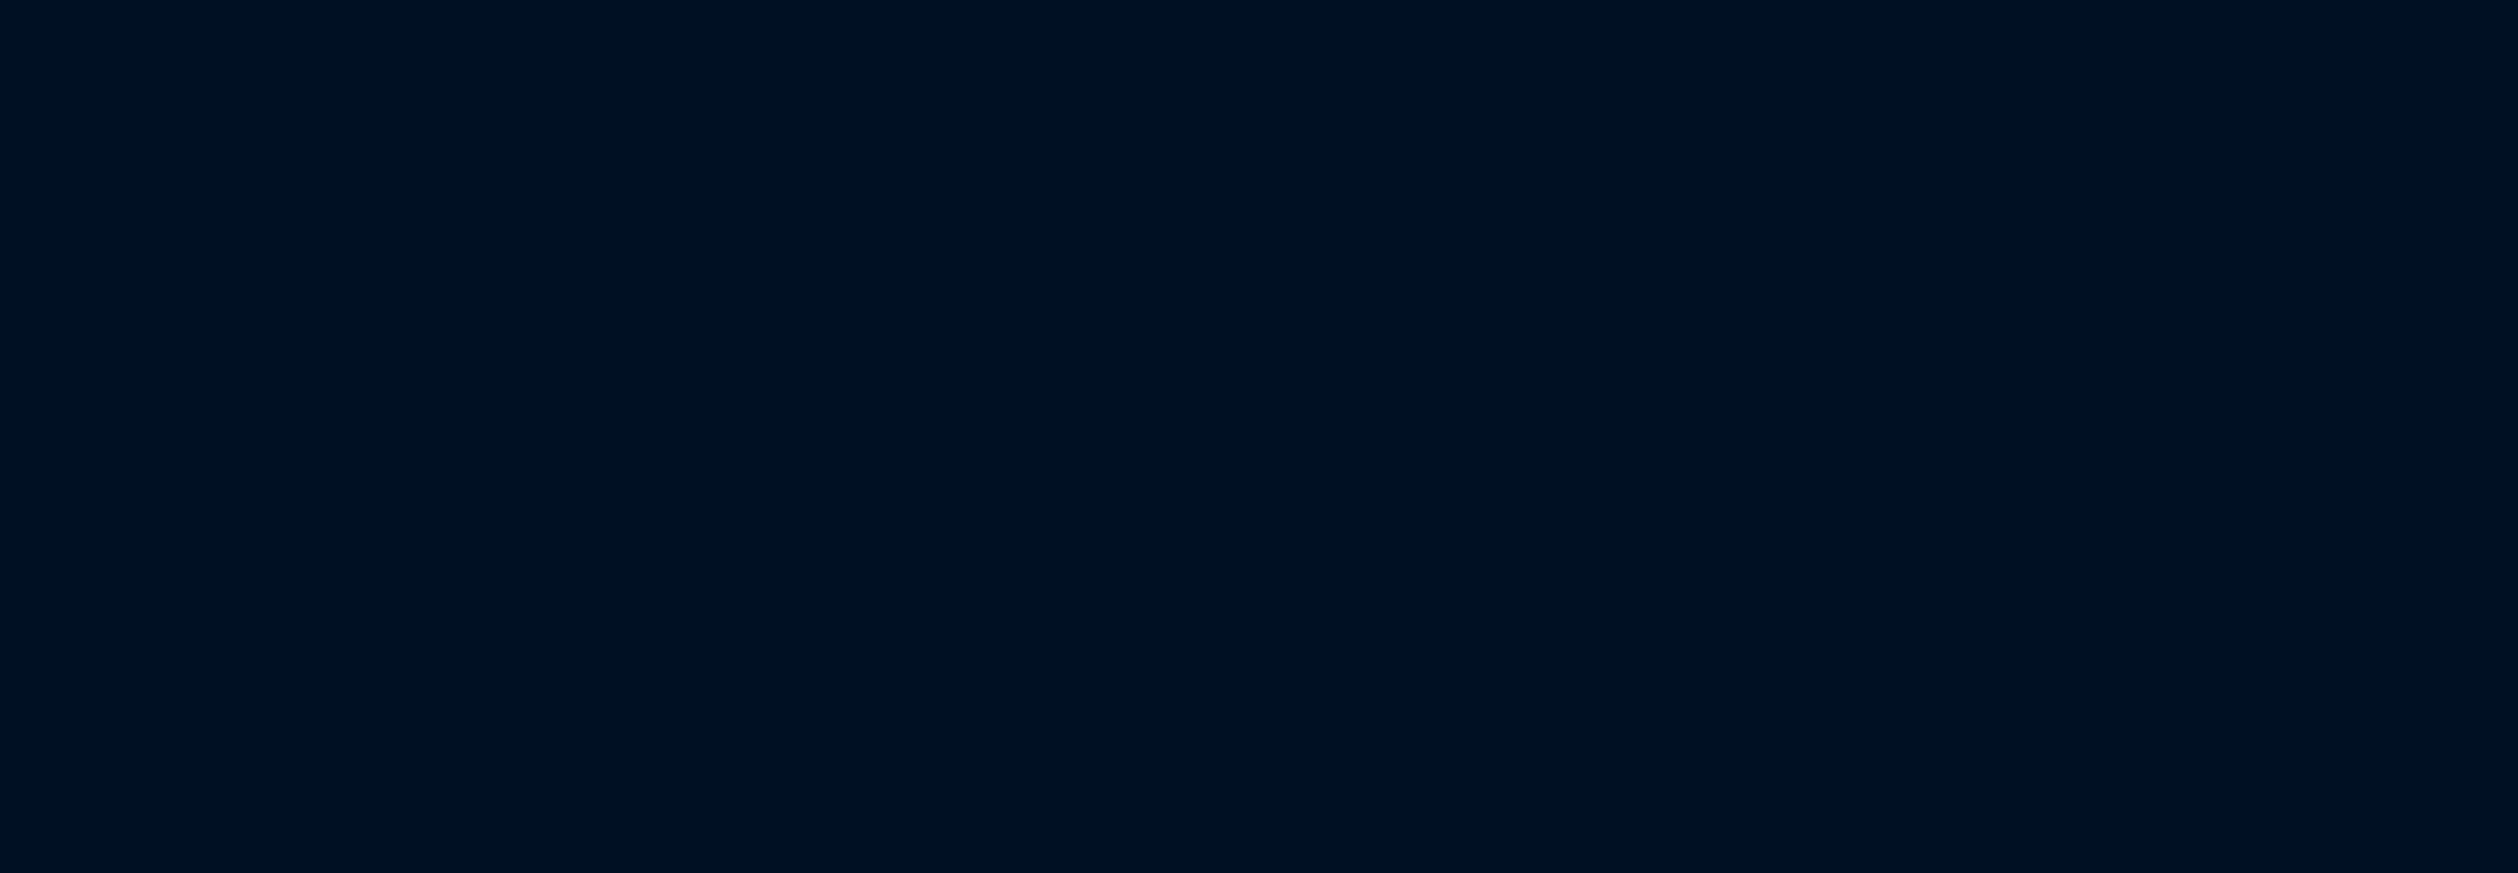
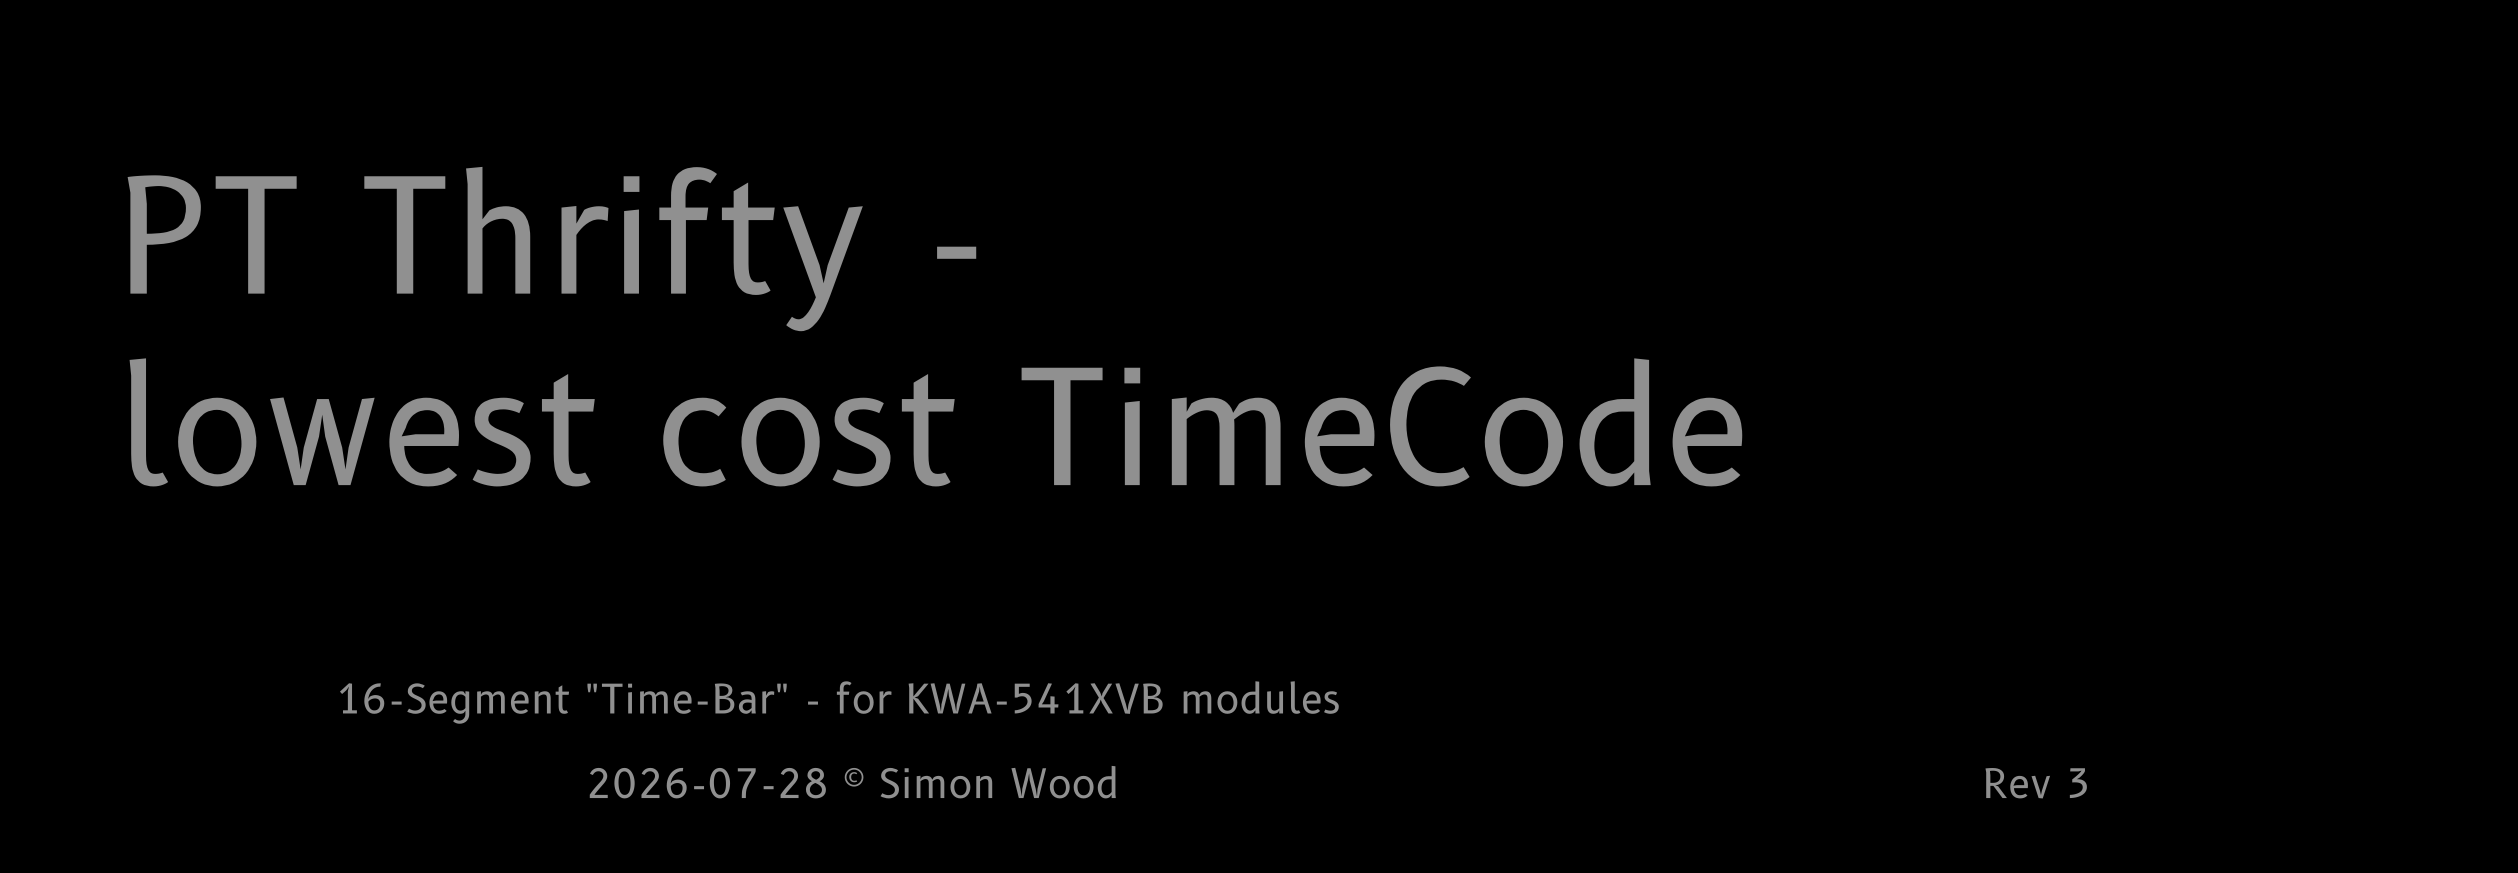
text: none -> PT Thrifty - (551, 249)
text: none -> lowest cost TimeCode (935, 422)
text: none -> 16-Segment "Time-Bar" - for KWA-541XVB modules (839, 702)
text: none -> Rev 3 (2036, 783)
text: none -> 2026-07-28 © Simon Wood (852, 782)

